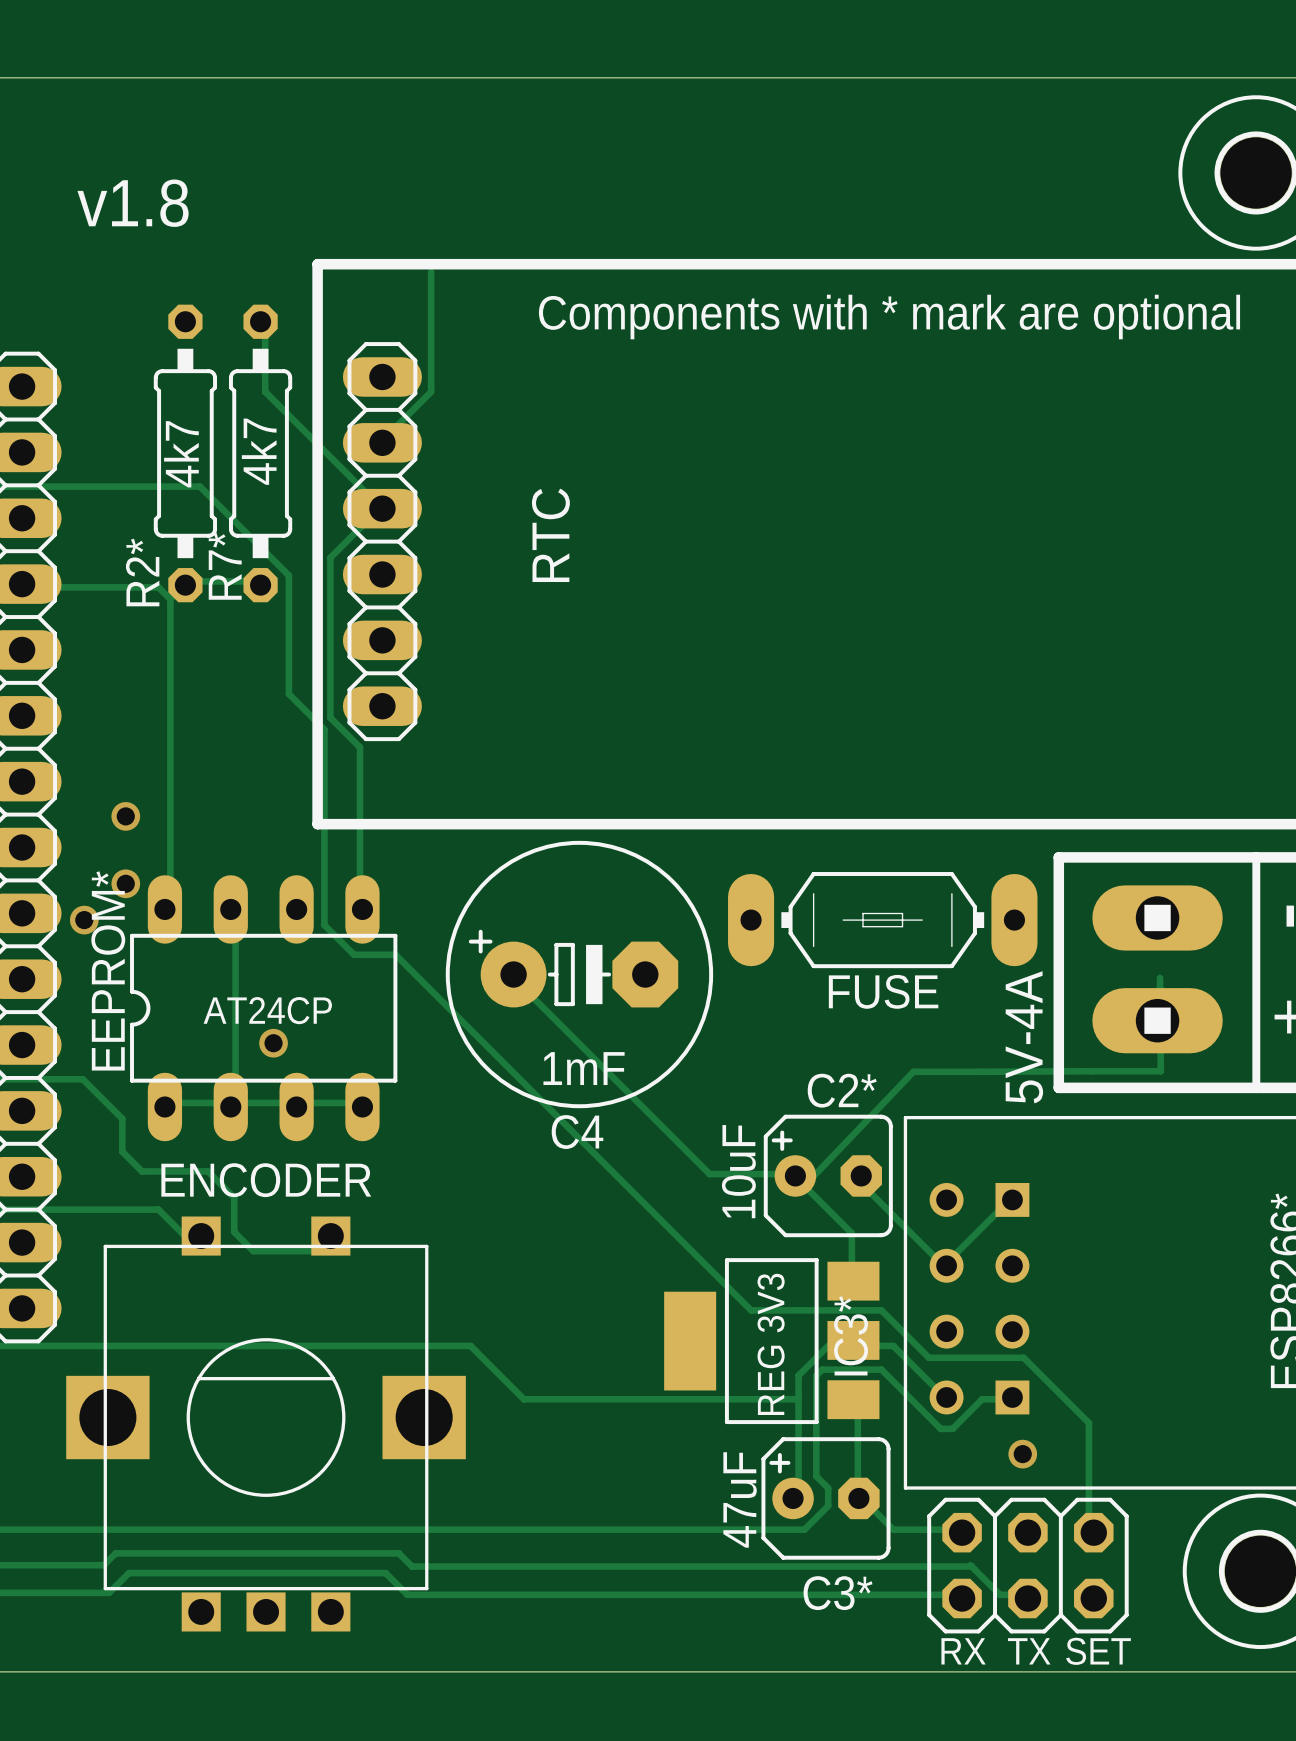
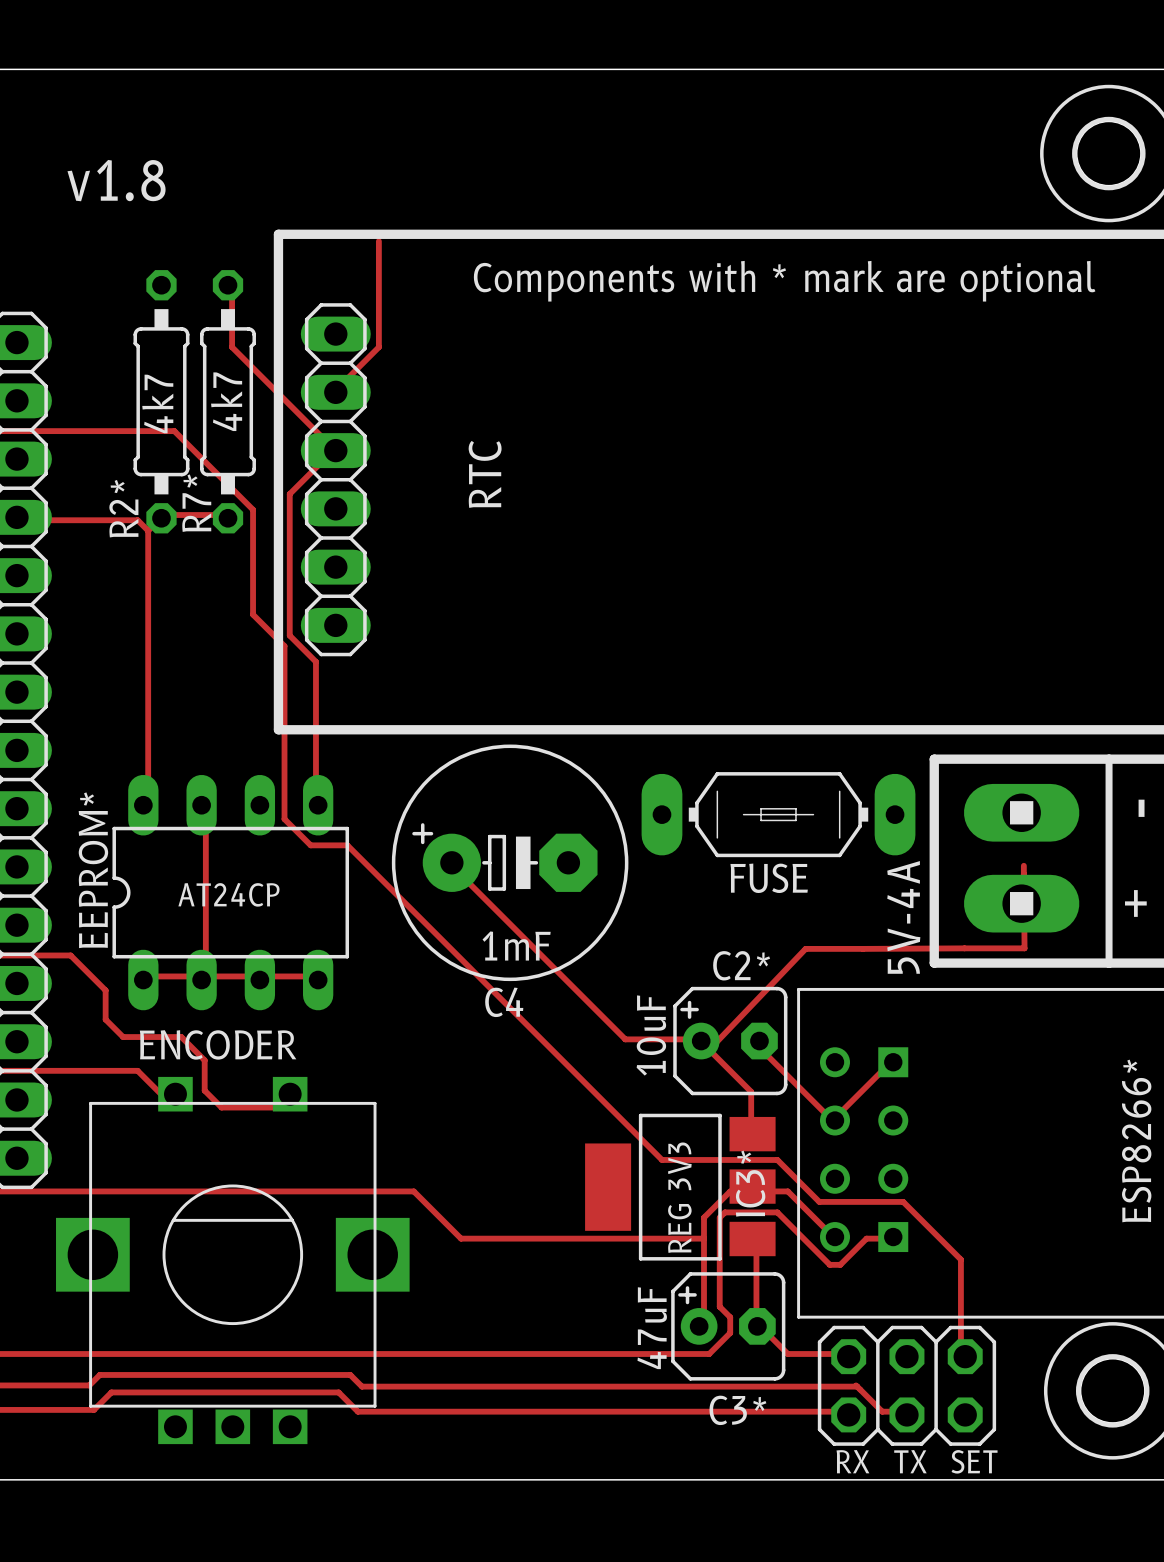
via: (125, 816) -> none
via: (125, 883) -> none
via: (84, 920) -> none
via: (273, 1043) -> none
via: (1022, 1454) -> none

